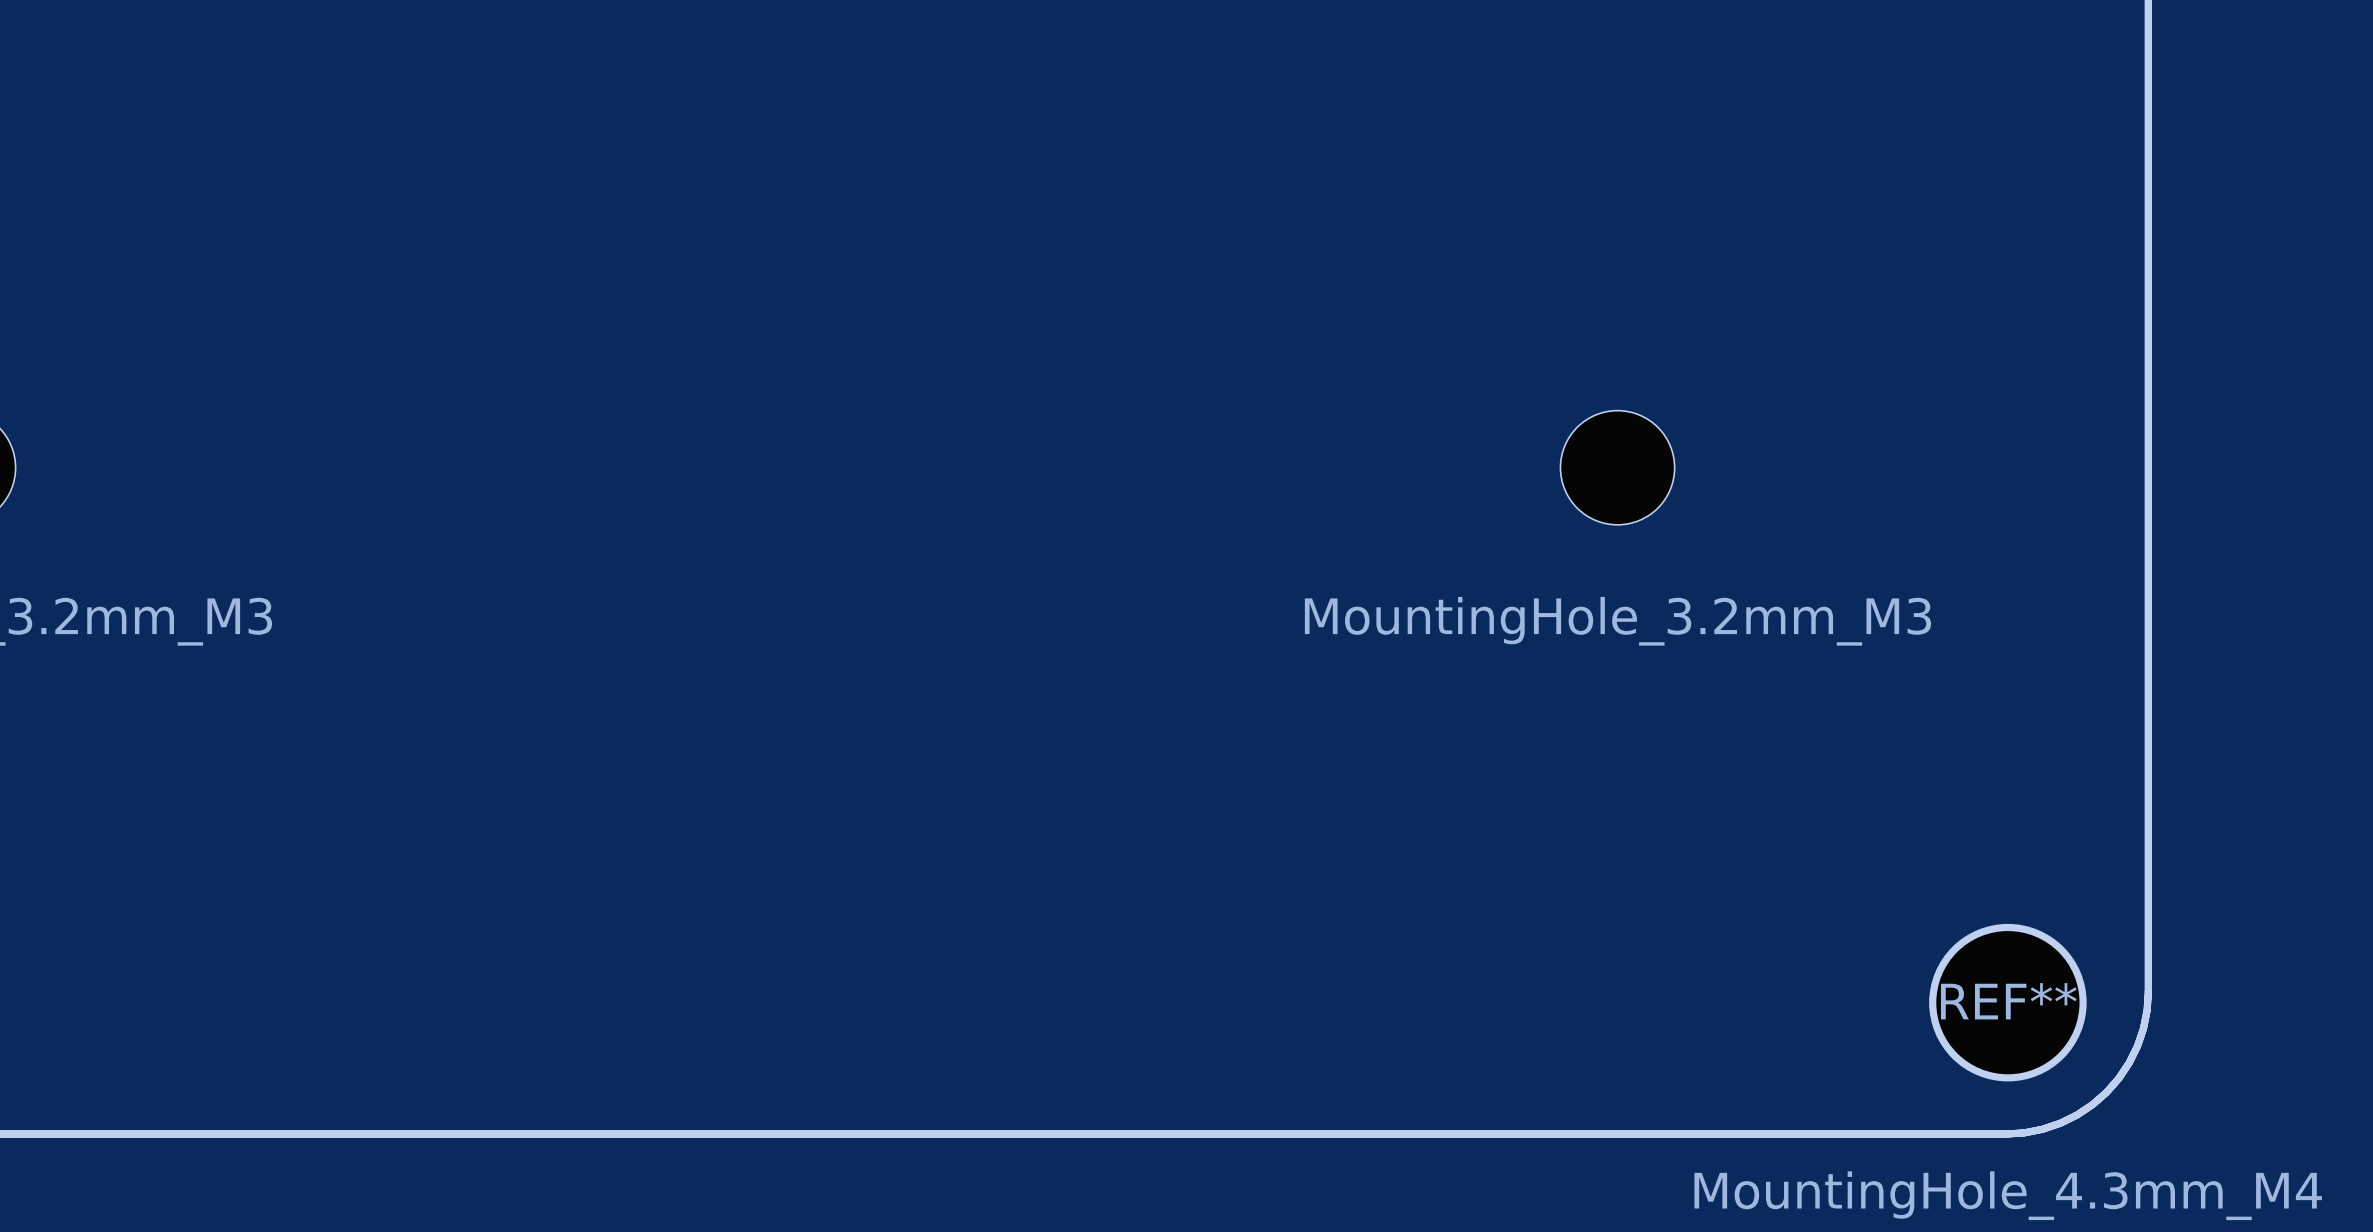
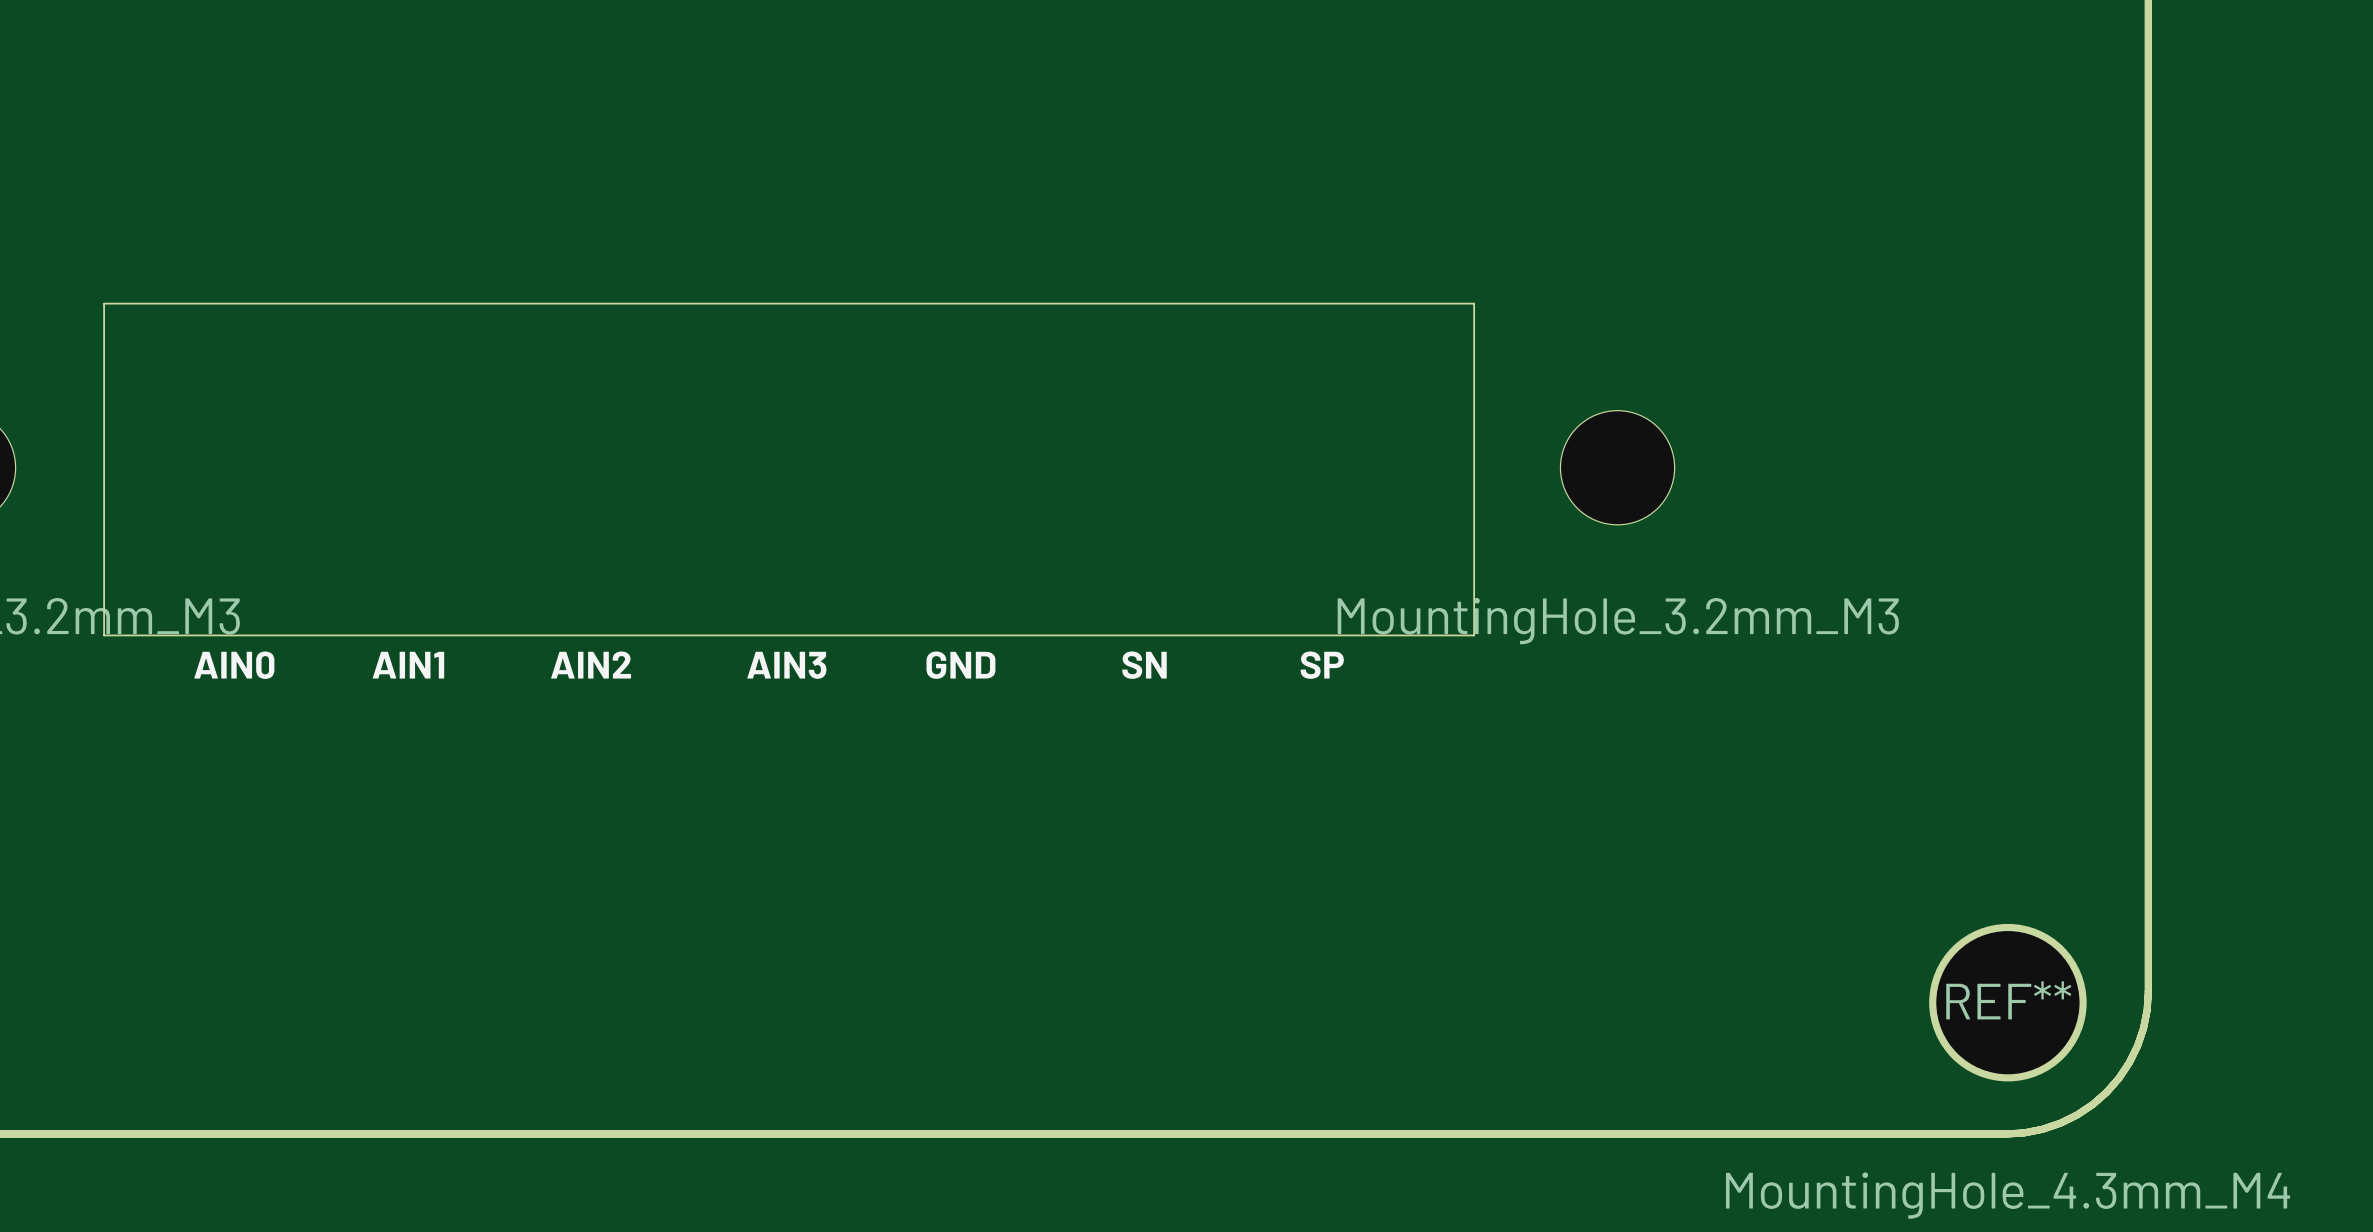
board edge: none -> (104, 303) (1474, 303) (1474, 635) (104, 635) (104, 303)
text: none -> AIN2 (591, 665)
text: none -> AIN0 (234, 665)
text: none -> AIN1 (408, 665)
text: none -> AIN3 (786, 665)
text: none -> GND (960, 665)
text: none -> SN (1144, 665)
text: none -> SP (1322, 665)

